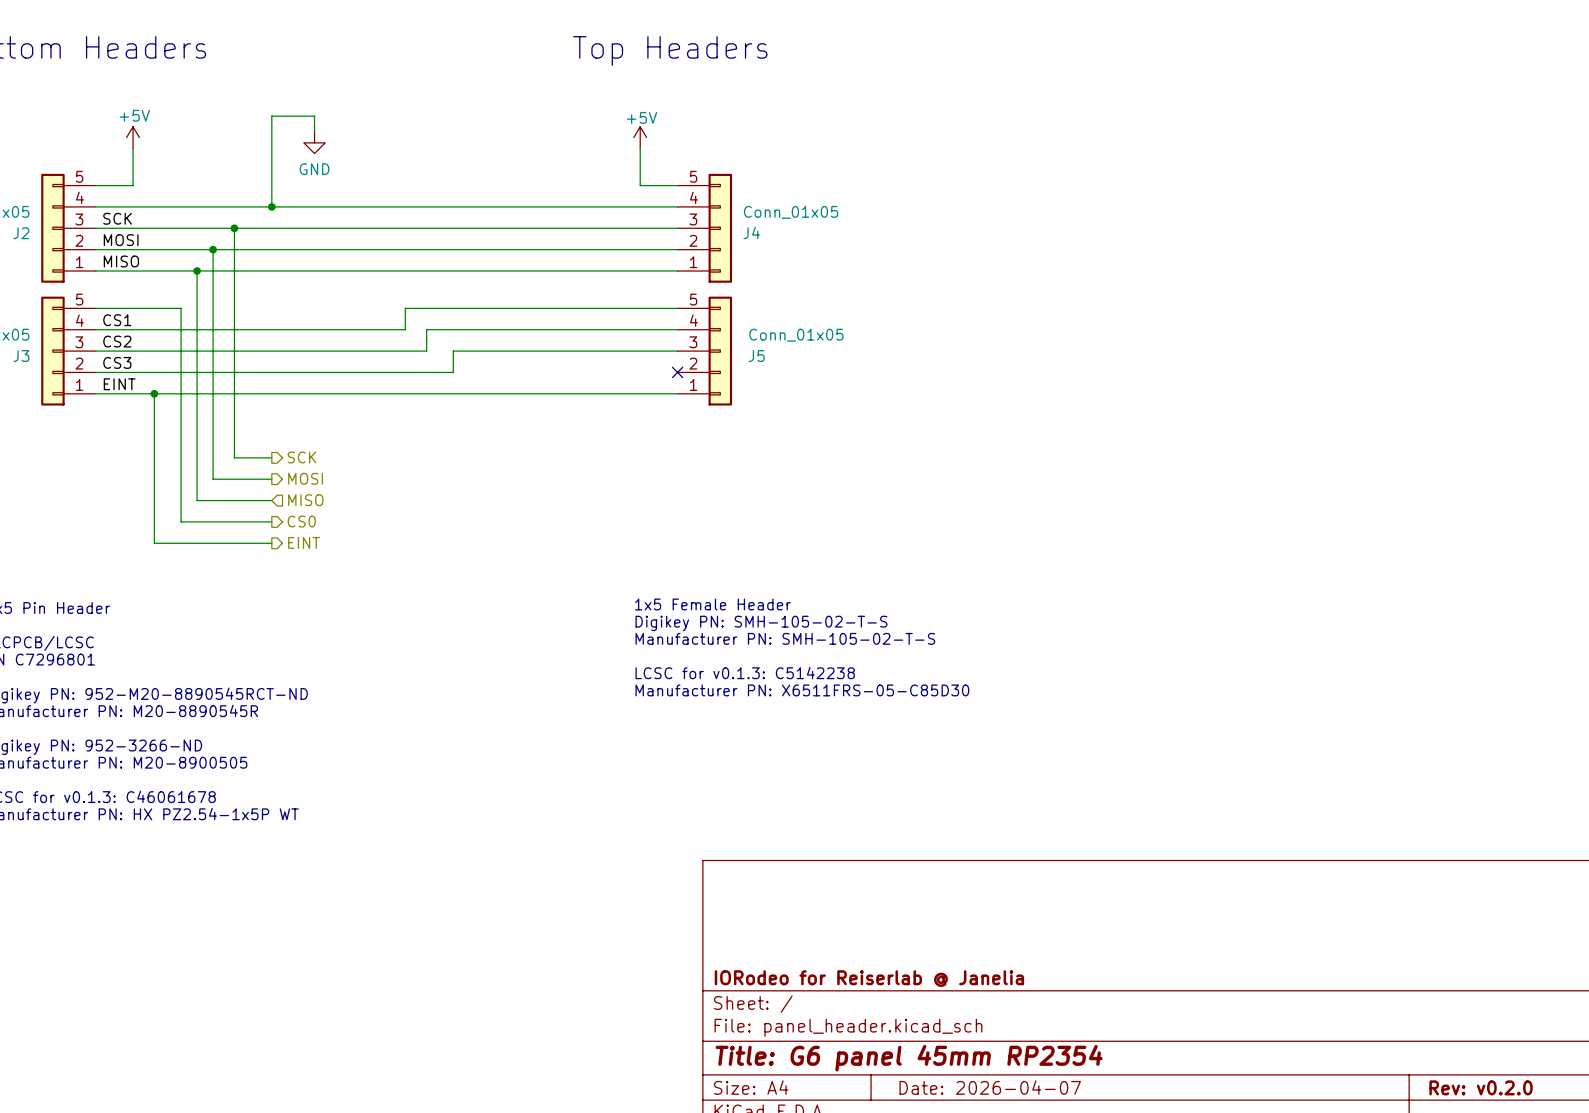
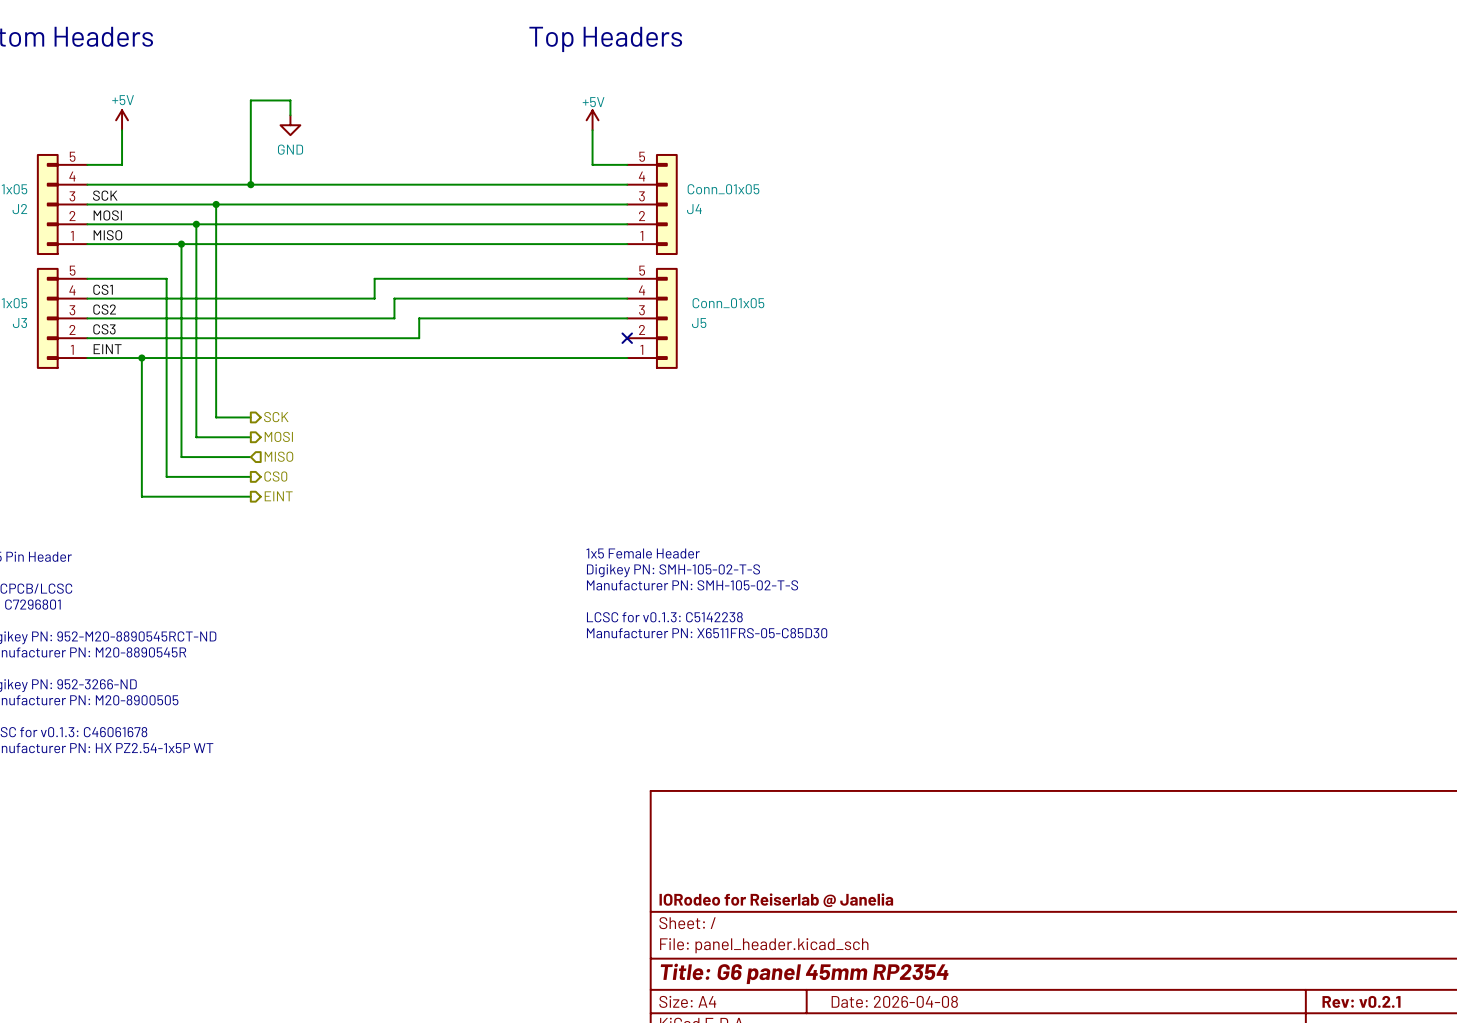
title block: Date: 2026-04-07 (990, 1087) -> Date: 2026-04-08 (894, 1001)
title block: Rev: v0.2.0 (1481, 1087) -> Rev: v0.2.1 (1361, 1001)

